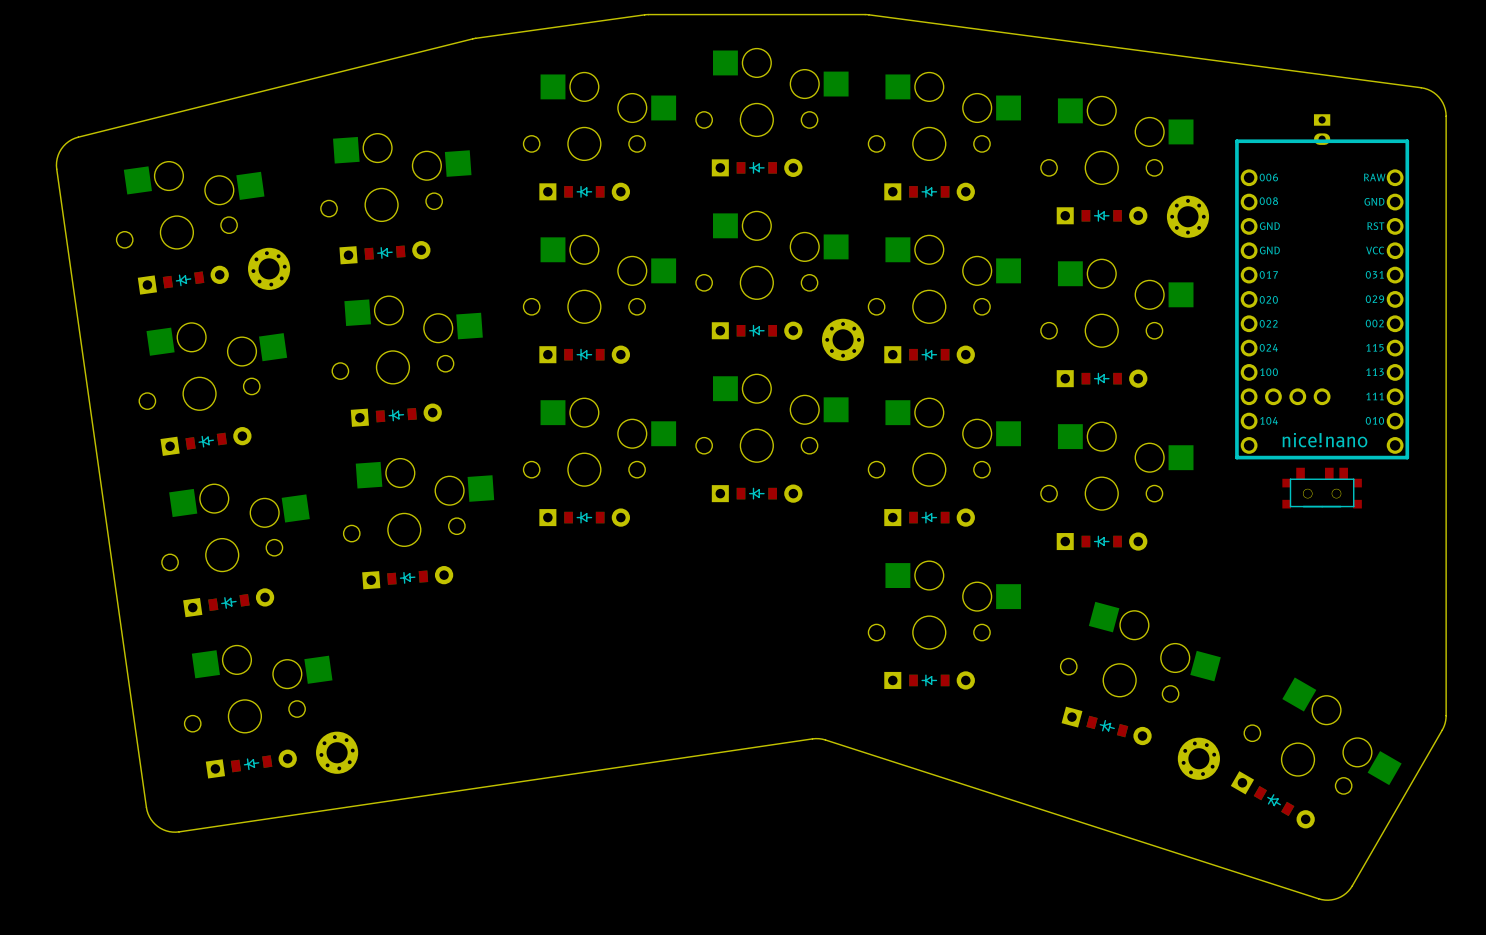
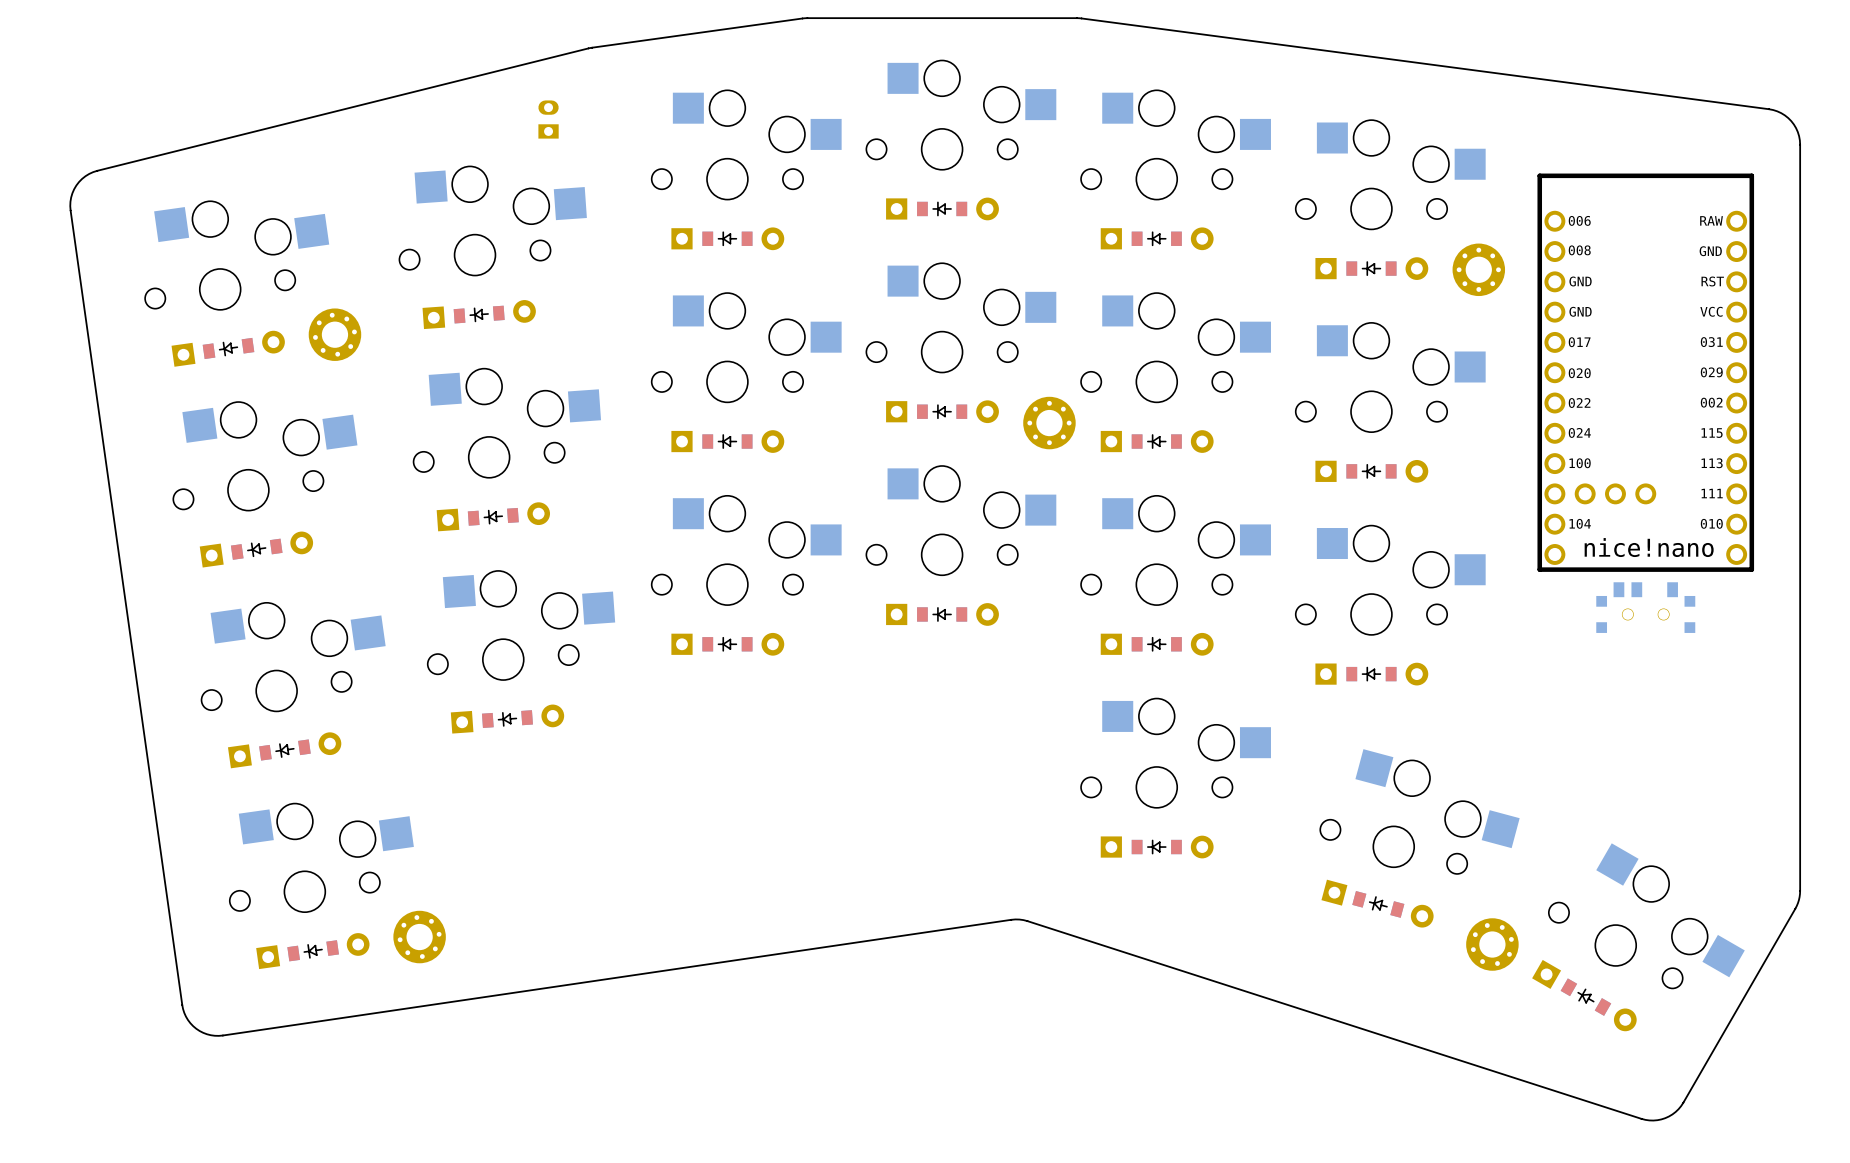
part: none -> (548, 119)
part: (1322, 129) -> none
part footprint: [1282, 467, 1362, 509] -> [1596, 582, 1696, 633]

